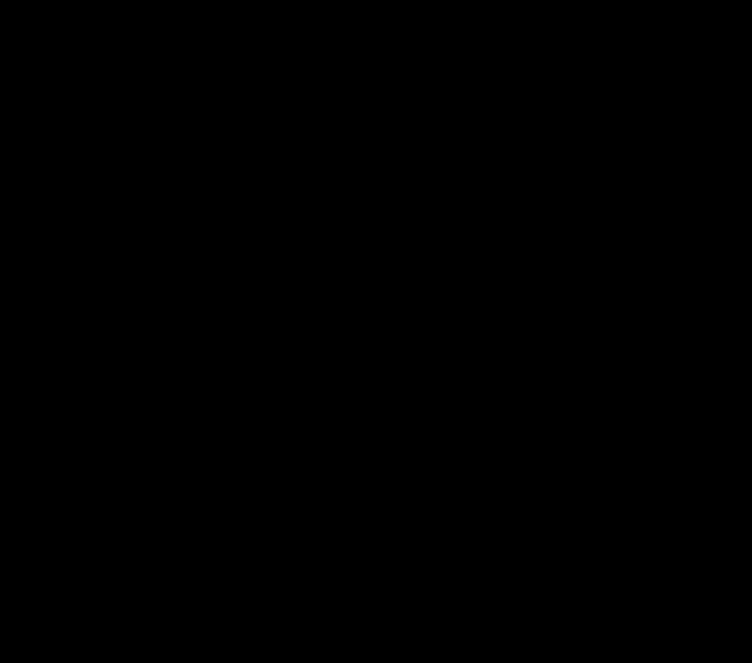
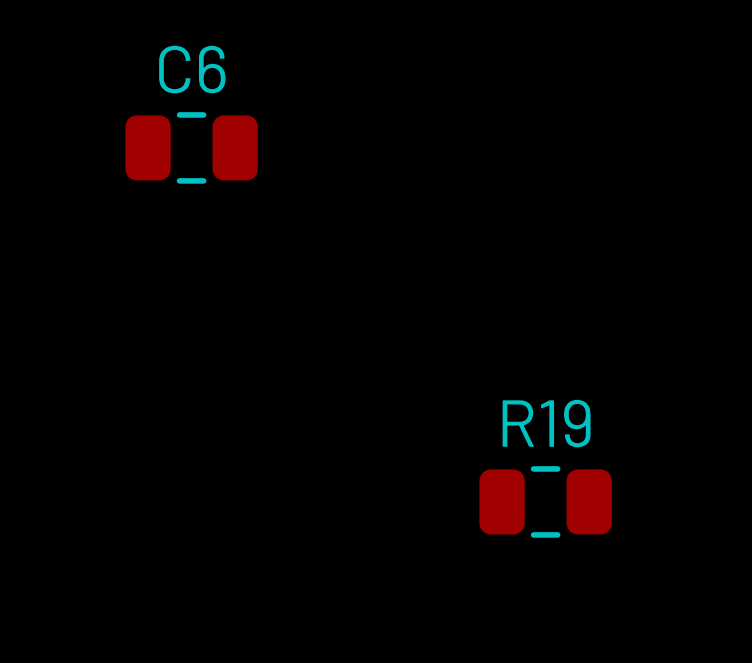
C6: none -> (191, 147)
R19: none -> (545, 501)

